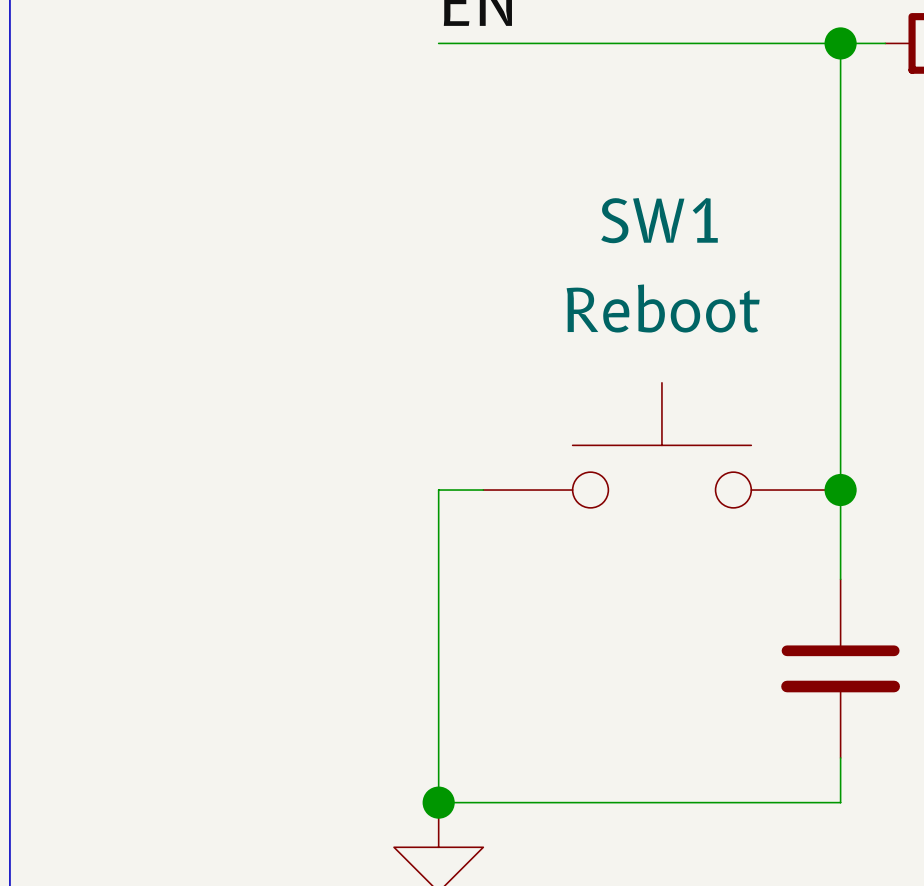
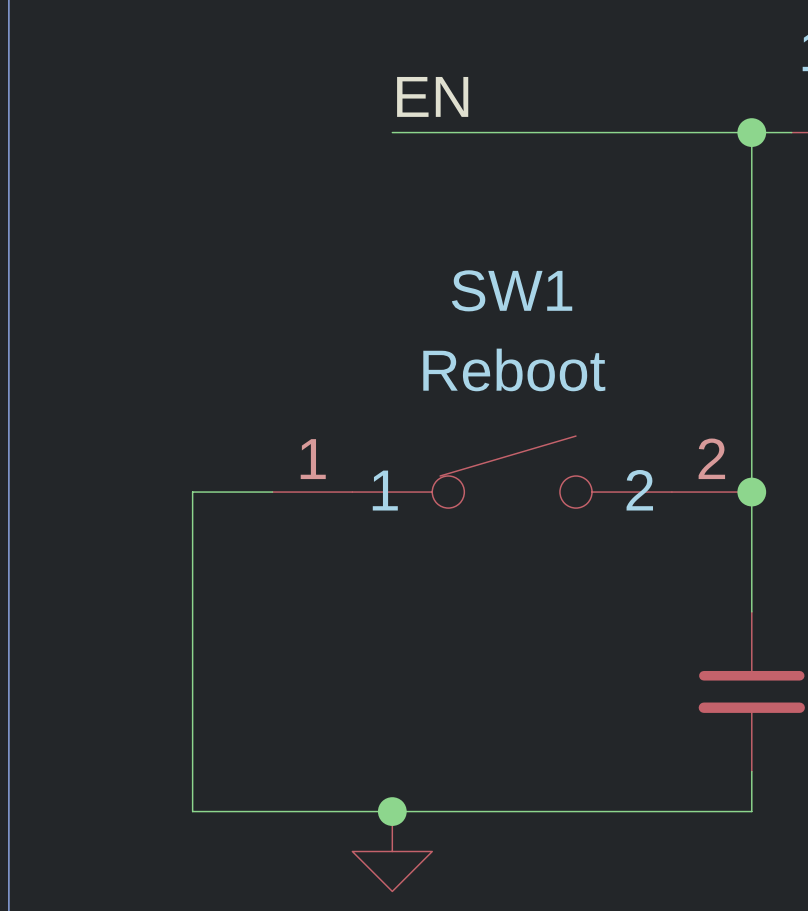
SW1 symbol: [483, 382, 841, 508] -> [272, 436, 752, 509]
wire: (483, 490) (438, 490) (438, 802) -> (272, 492) (192, 492) (192, 811) (392, 811)
junction position: (840, 490) -> (751, 492)

